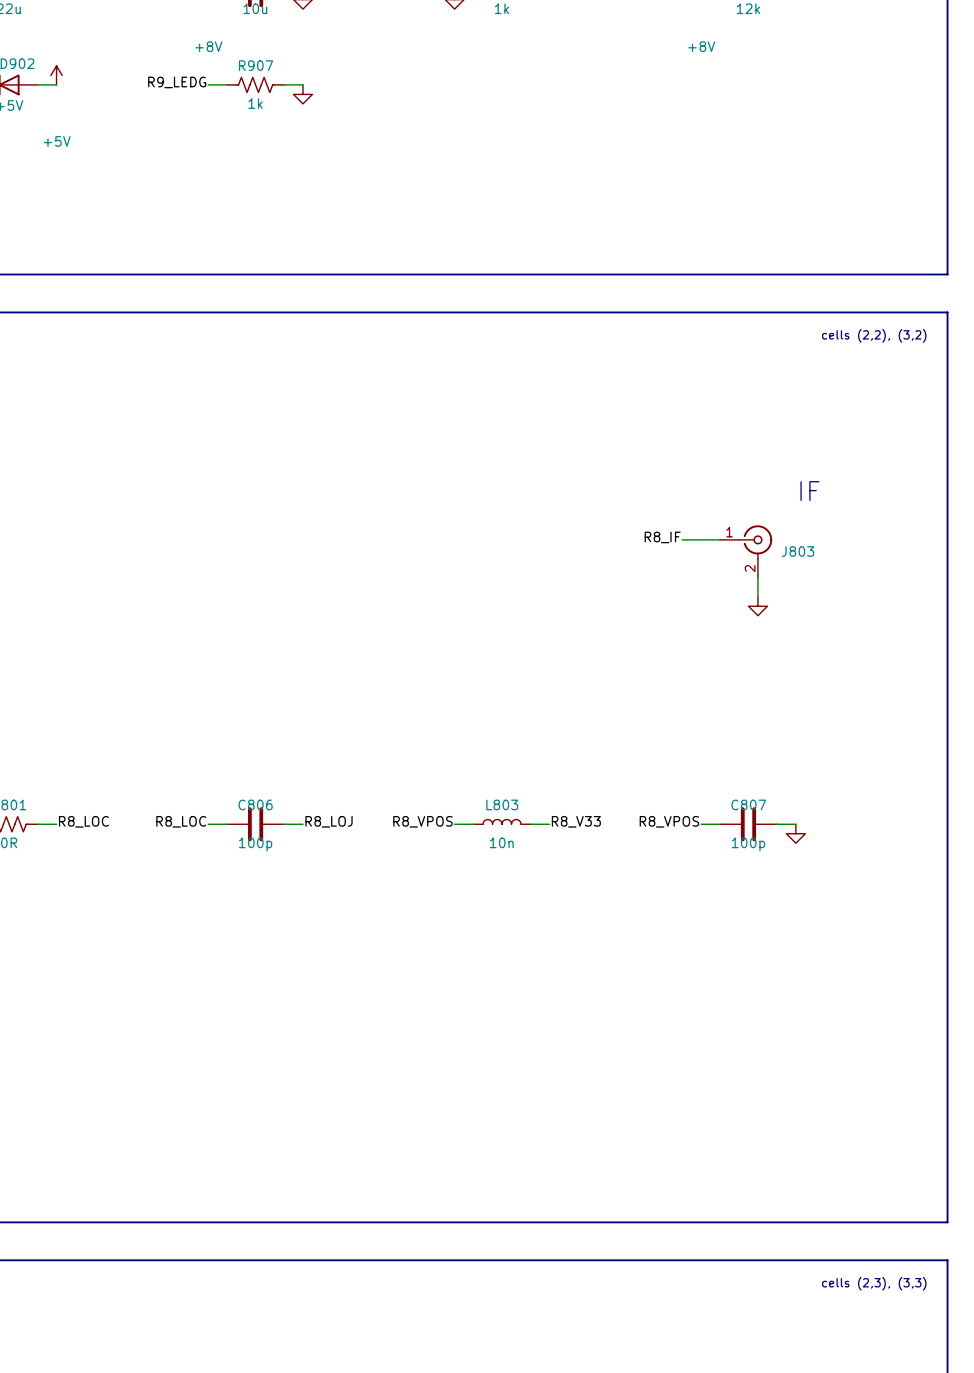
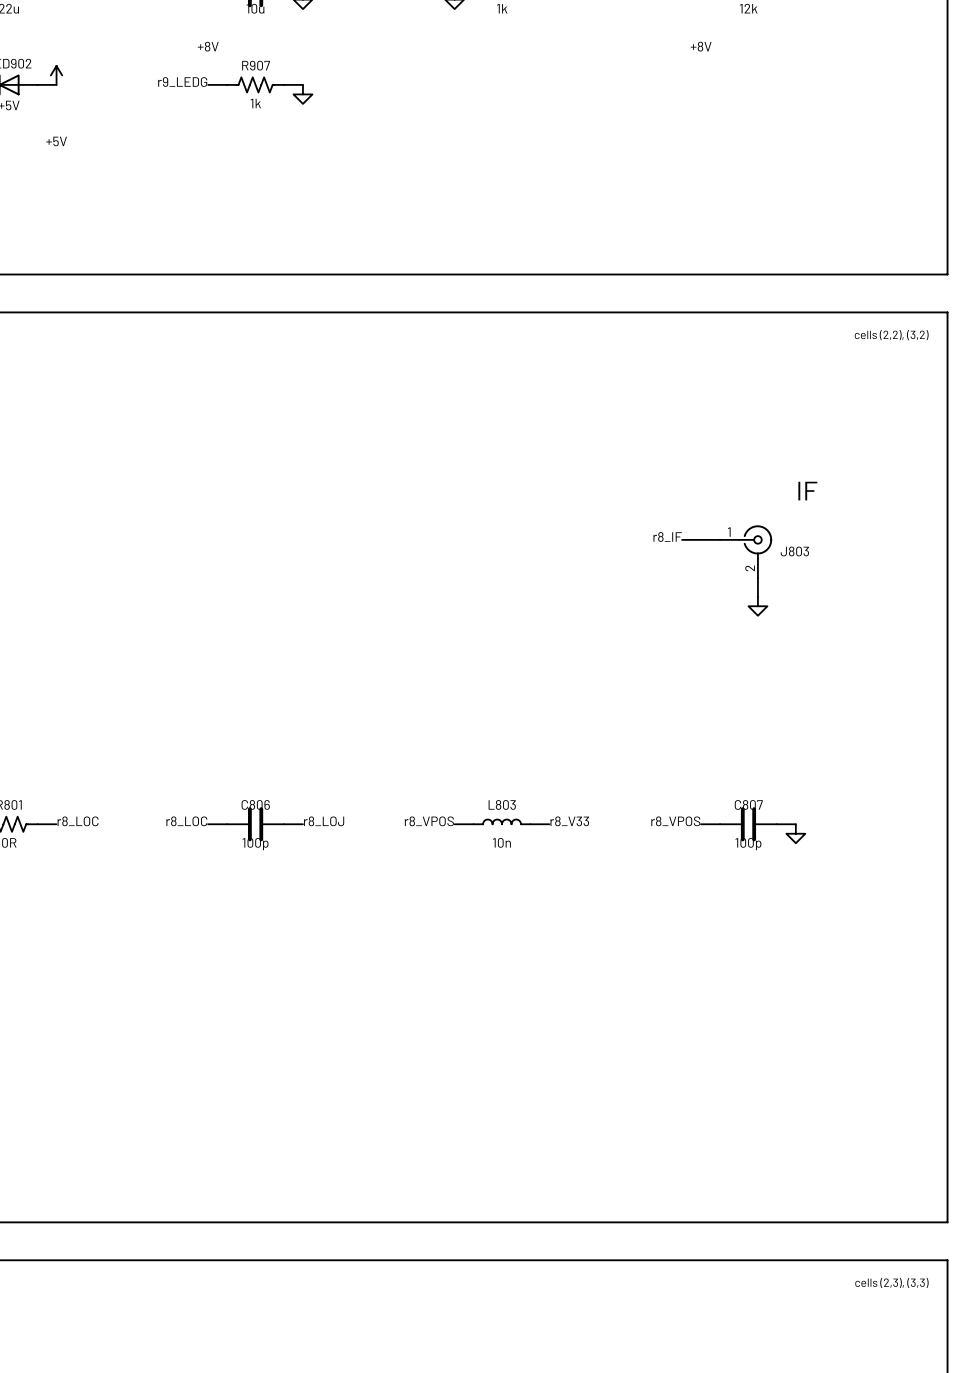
label: R9_LEDG (177, 82) -> r9_LEDG (182, 82)
label: R8_IF (662, 537) -> r8_IF (667, 536)
label: R8_LOC (83, 821) -> r8_LOC (78, 821)
label: R8_LOC (181, 821) -> r8_LOC (186, 821)
label: R8_LOJ (329, 821) -> r8_LOJ (324, 821)
label: R8_VPOS (422, 821) -> r8_VPOS (429, 821)
label: R8_V33 (576, 821) -> r8_V33 (569, 821)
label: R8_VPOS (669, 821) -> r8_VPOS (675, 821)

